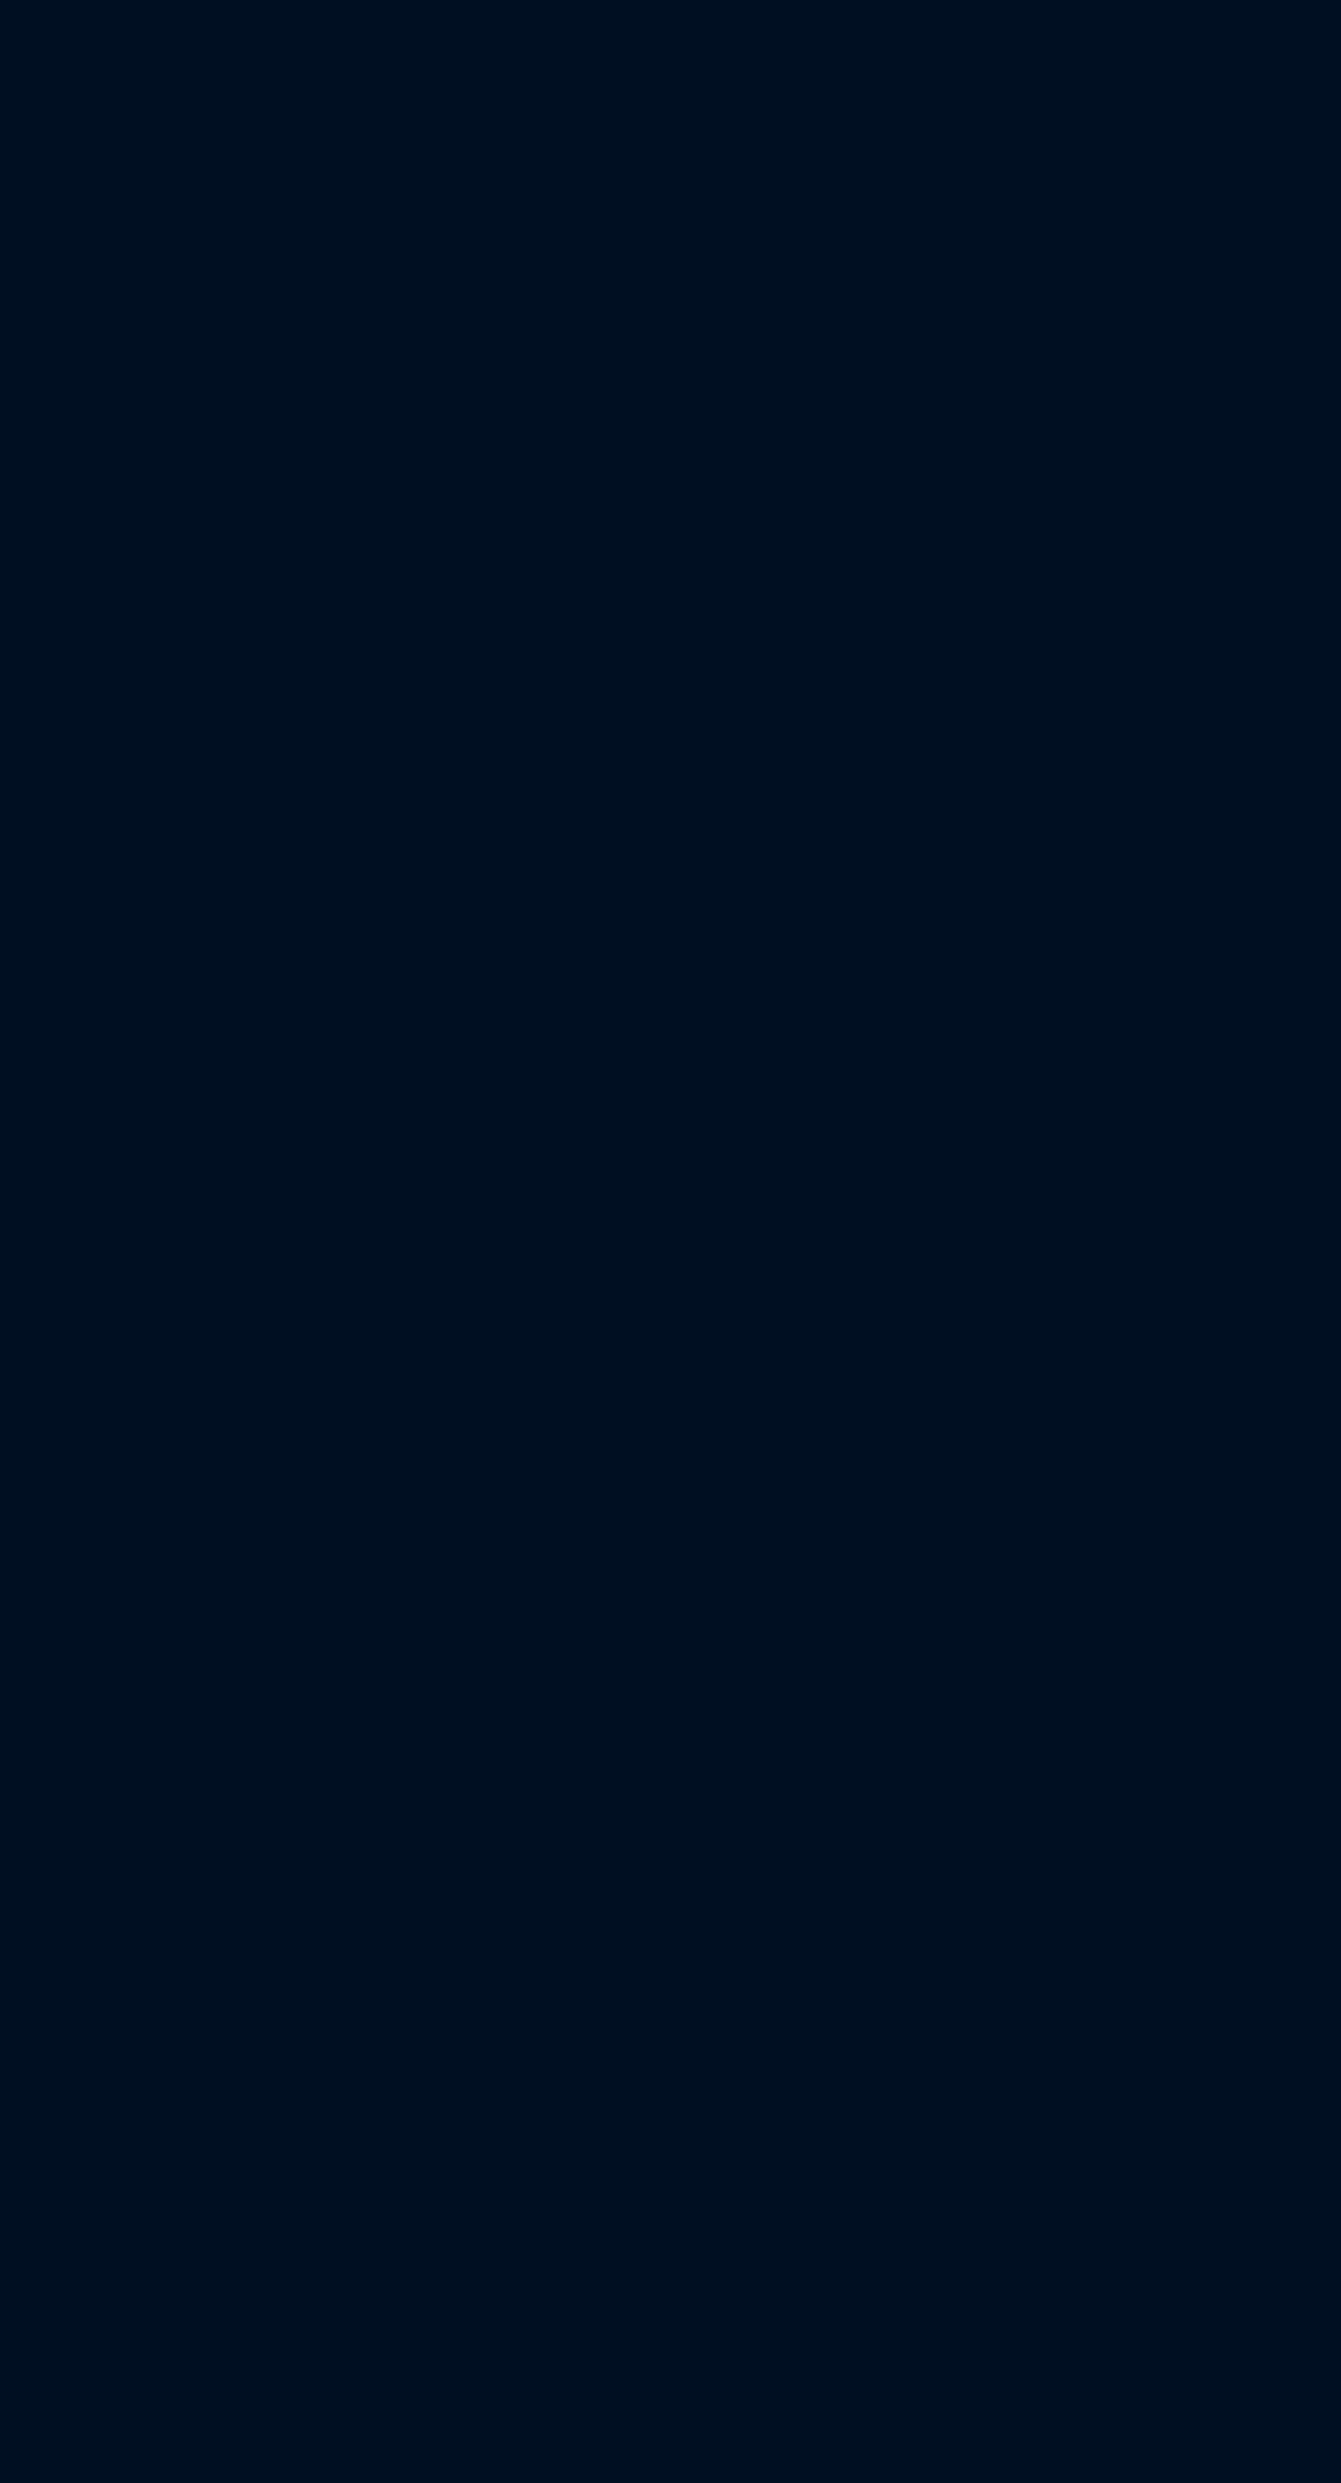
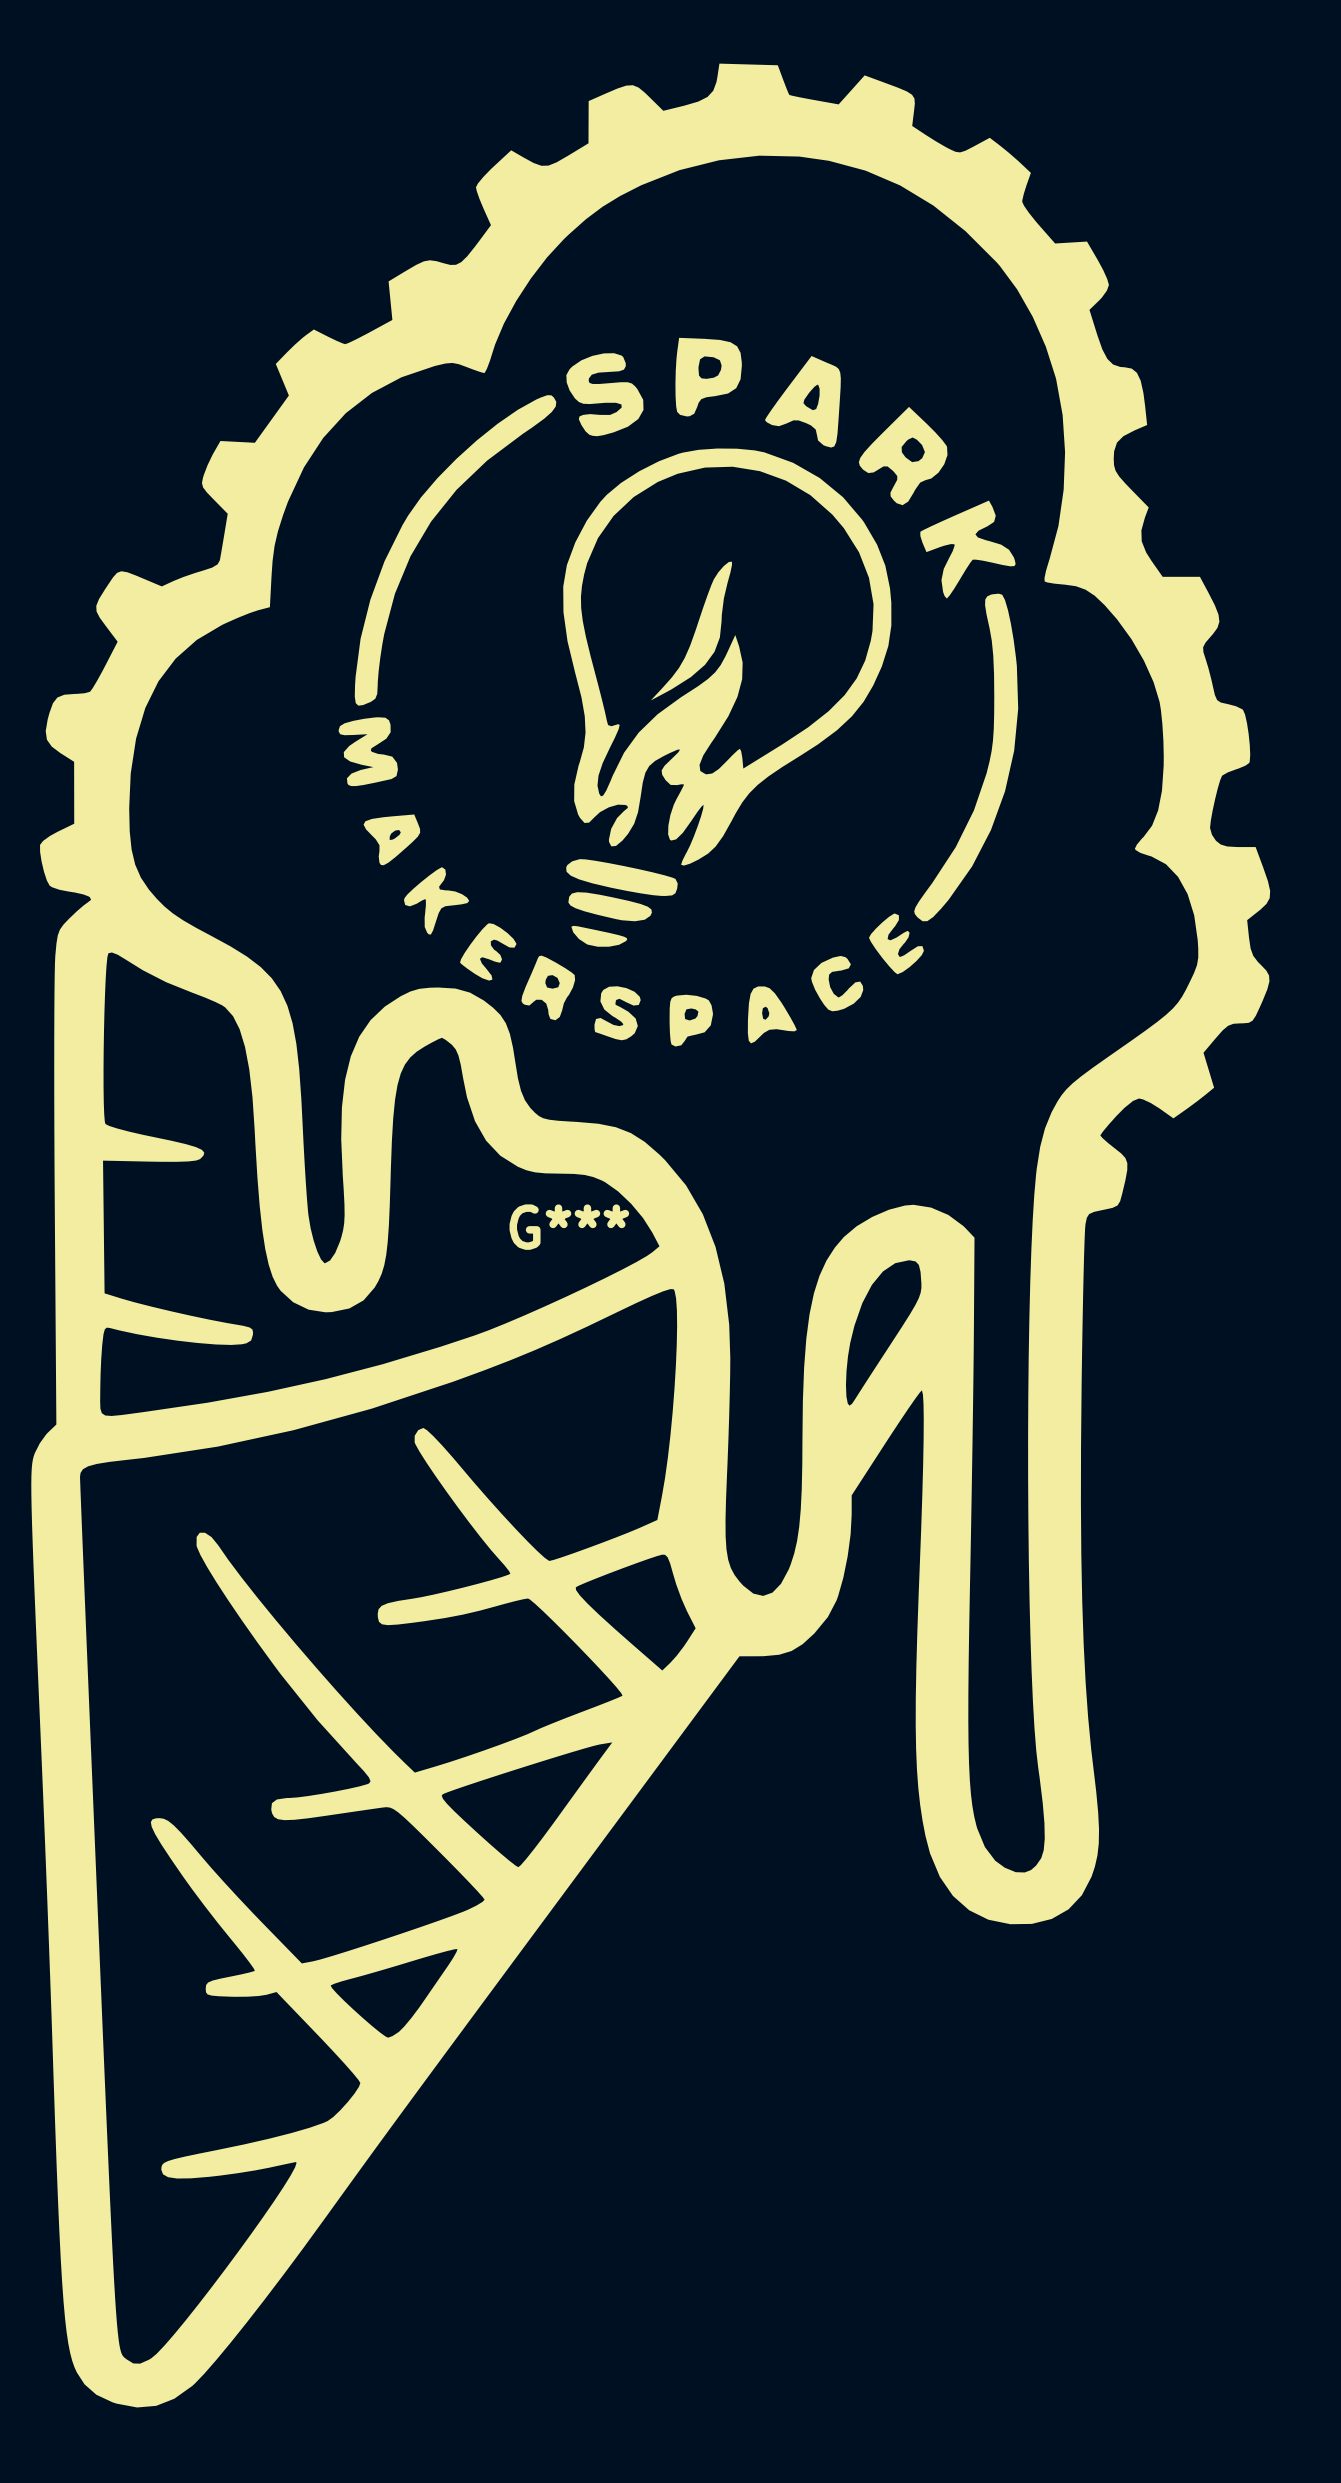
G***: none -> (650, 1235)

